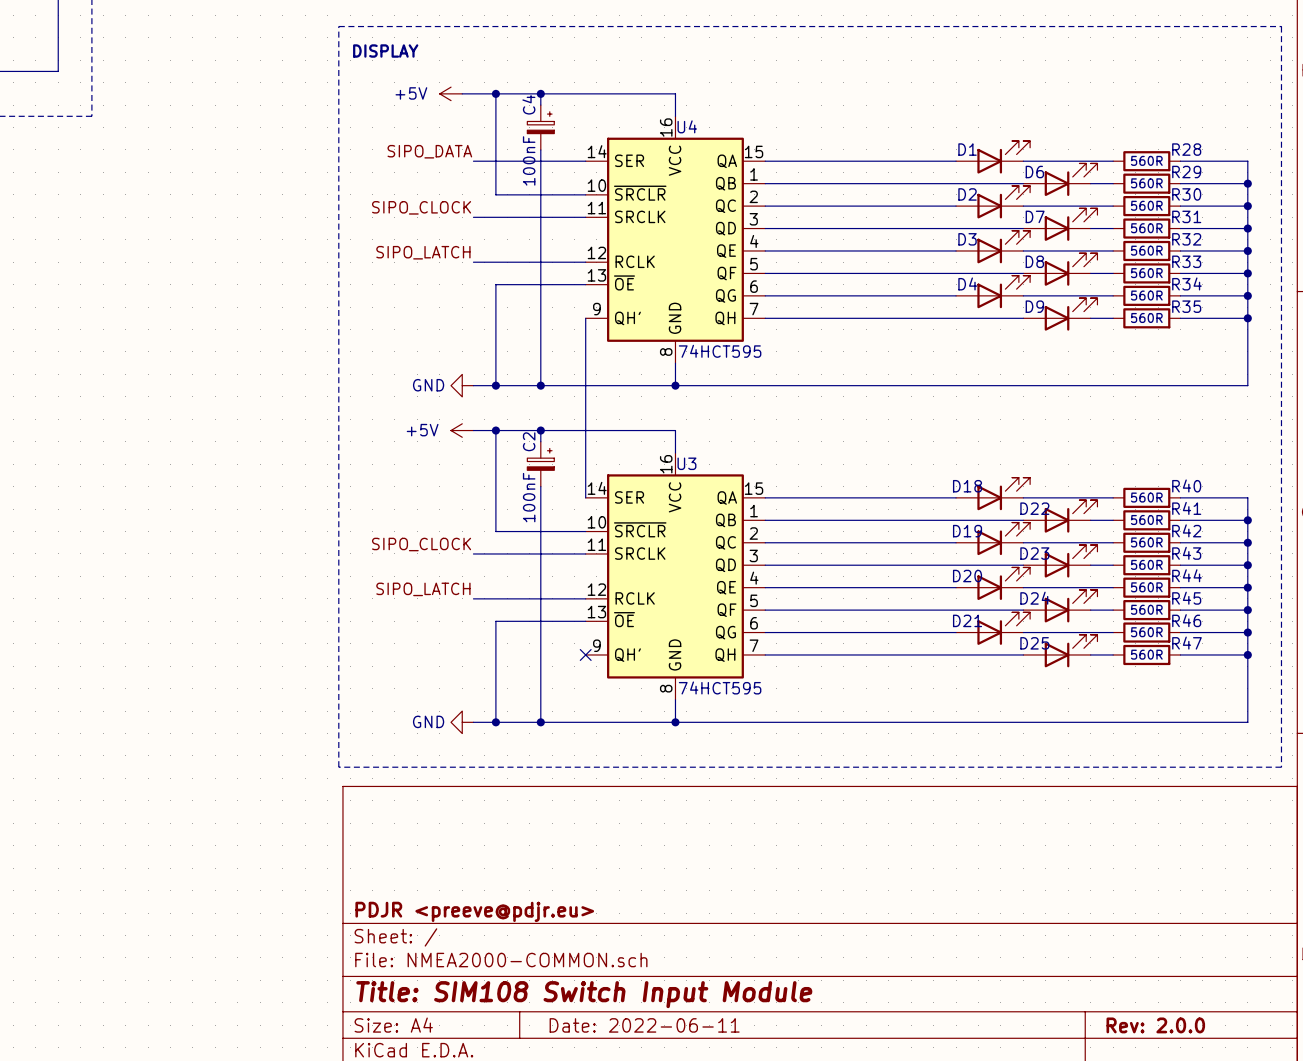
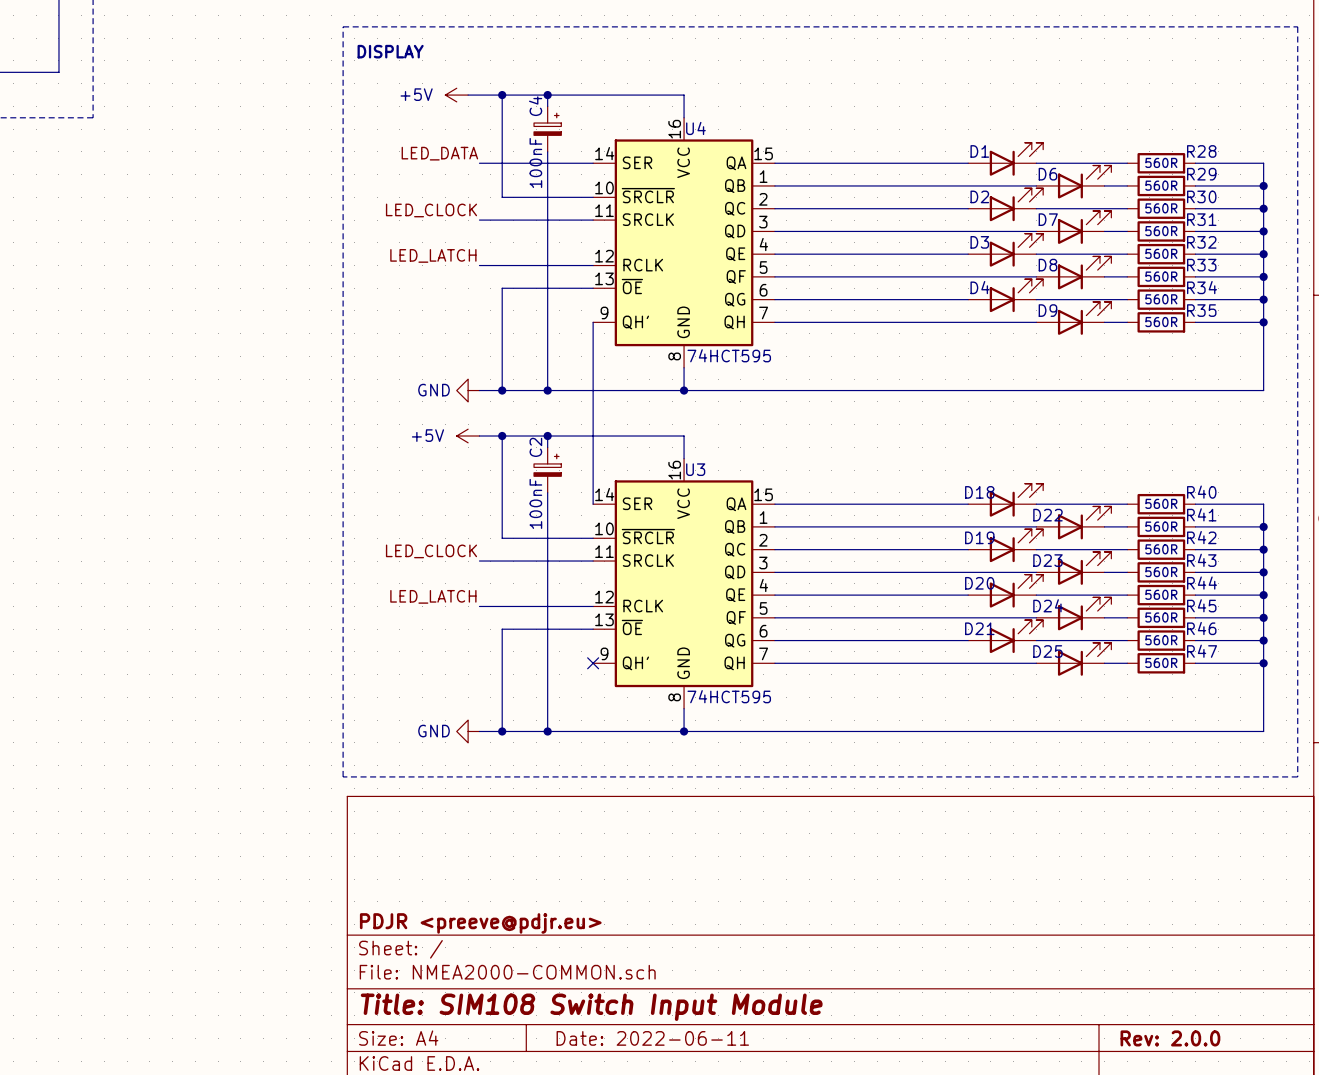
label: SIPO_DATA (429, 151) -> LED_DATA (439, 153)
label: SIPO_CLOCK (421, 207) -> LED_CLOCK (431, 210)
label: SIPO_LATCH (423, 252) -> LED_LATCH (433, 255)
label: SIPO_CLOCK (421, 544) -> LED_CLOCK (431, 551)
label: SIPO_LATCH (423, 589) -> LED_LATCH (433, 596)

